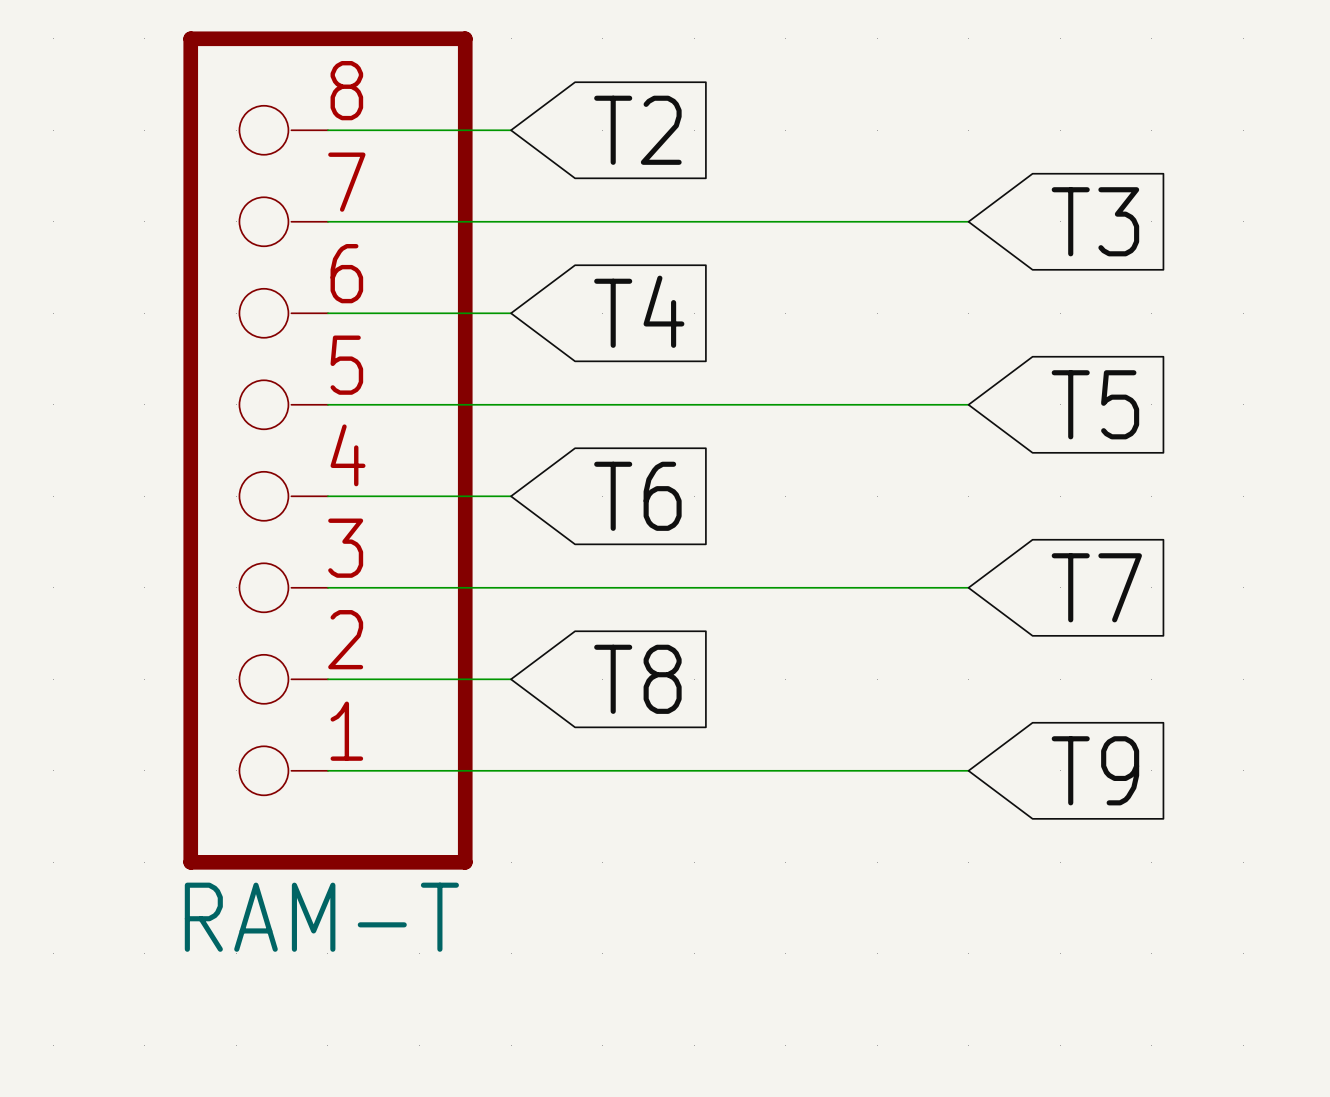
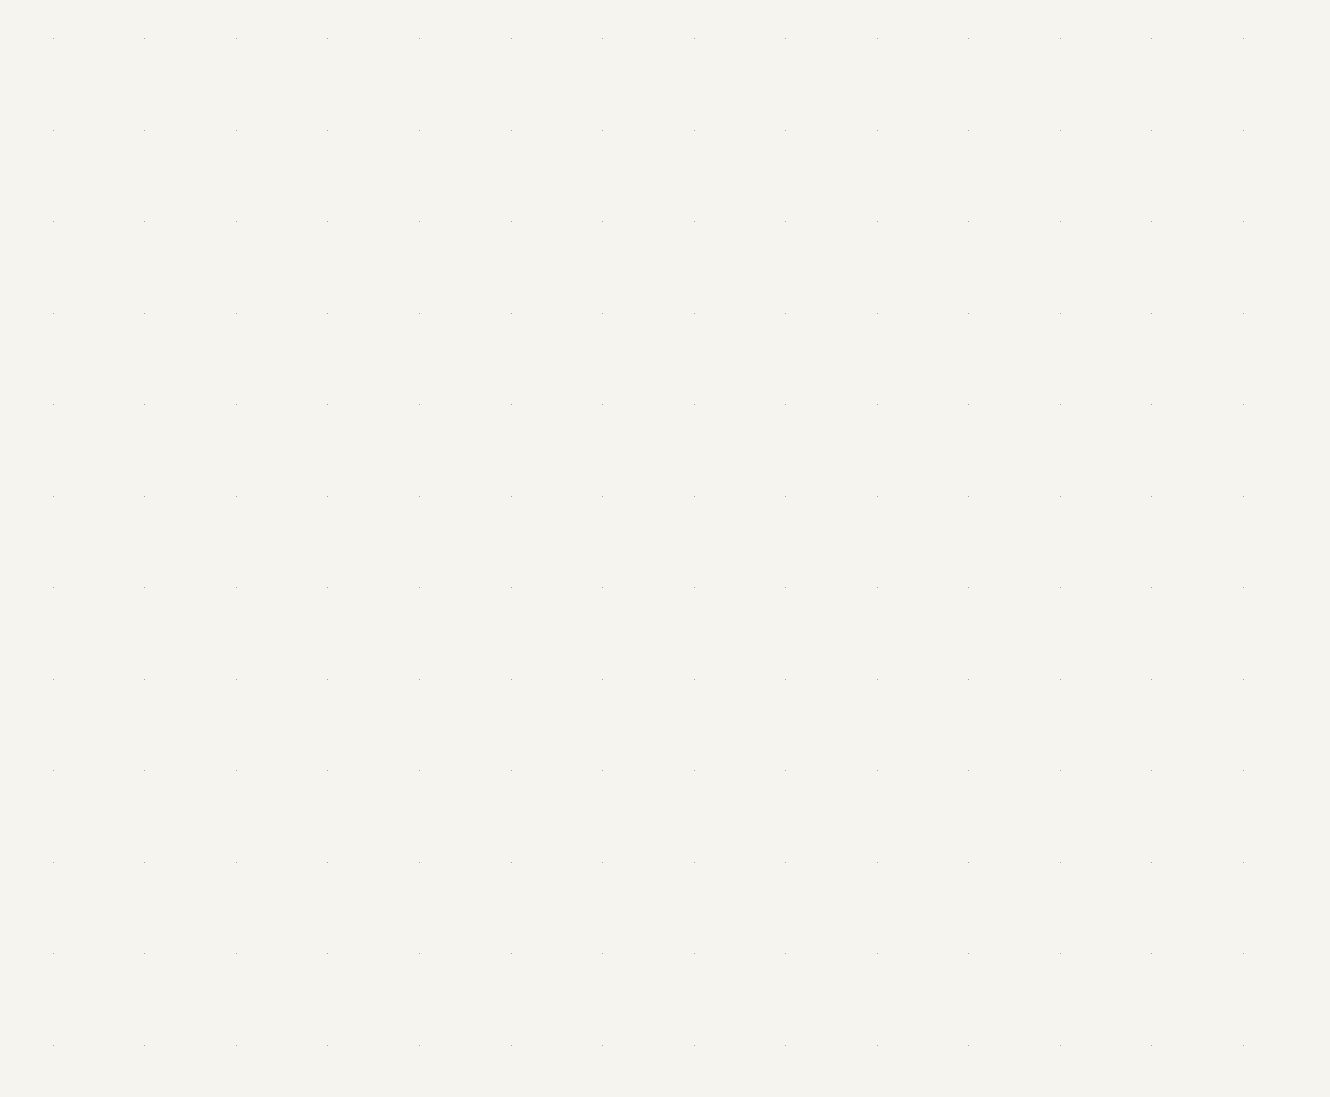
wire: (327, 130) (511, 130) -> none
global label: T2 (637, 130) -> none
wire: (327, 221) (968, 221) -> none
global label: T3 (1095, 221) -> none
global label: T4 (639, 311) -> none
wire: (327, 313) (511, 313) -> none
wire: (327, 404) (968, 404) -> none
global label: T5 (1095, 404) -> none
RAM-T: (327, 450) -> none
wire: (327, 496) (511, 496) -> none
global label: T6 (637, 496) -> none
wire: (327, 587) (968, 587) -> none
global label: T7 (1096, 587) -> none
wire: (327, 679) (511, 679) -> none
global label: T8 (637, 679) -> none
wire: (327, 770) (968, 770) -> none
global label: T9 (1095, 770) -> none

